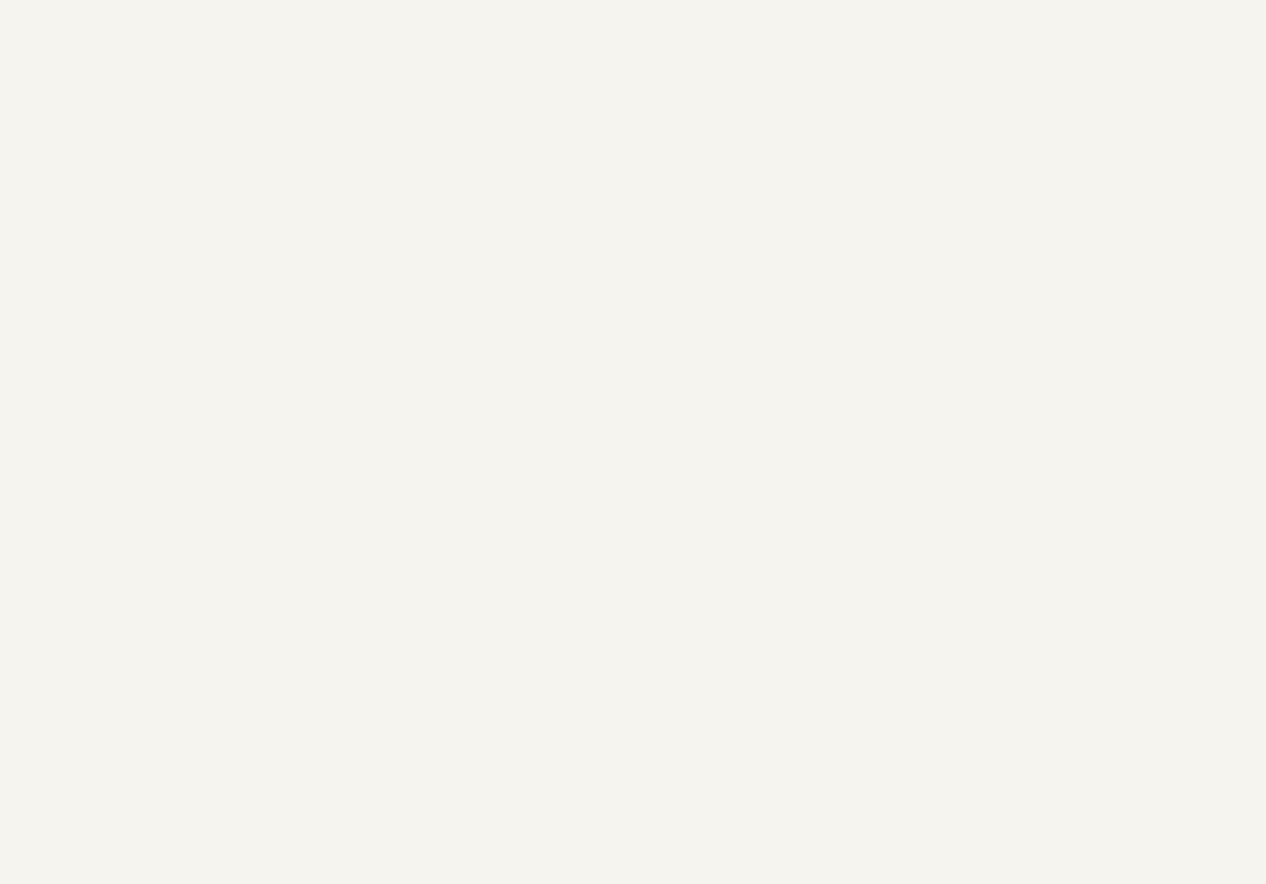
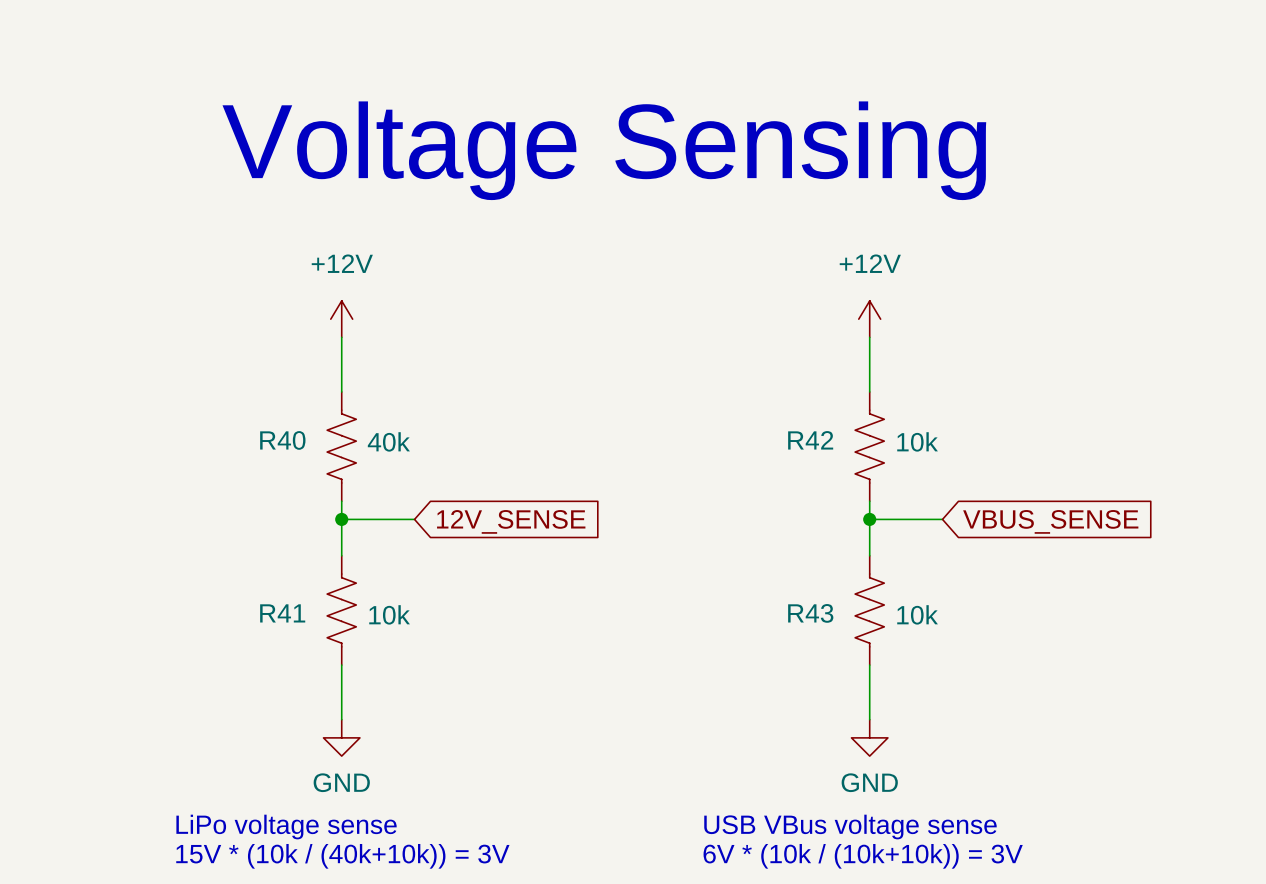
text: none -> Voltage Sensing (604, 150)
power symbol: none -> +12V (341, 319)
power symbol: none -> +12V (869, 319)
wire: none -> (341, 337) (341, 391)
wire: none -> (869, 337) (869, 391)
R40: none -> 40k (341, 446)
R42: none -> 10k (869, 446)
wire: none -> (341, 501) (341, 555)
wire: none -> (869, 501) (869, 555)
wire: none -> (341, 519) (414, 519)
junction: none -> (341, 519)
wire: none -> (869, 519) (942, 519)
junction: none -> (869, 519)
global label: none -> 12V_SENSE (511, 521)
global label: none -> VBUS_SENSE (1050, 521)
R41: none -> 10k (341, 610)
R43: none -> 10k (869, 610)
wire: none -> (341, 665) (341, 719)
wire: none -> (869, 665) (869, 719)
power symbol: none -> GND (341, 737)
power symbol: none -> GND (869, 737)
text: none -> LiPo voltage sense (286, 827)
text: none -> USB VBus voltage sense (850, 827)
text: none -> 15V * (10k / (40k+10k)) = 3V (342, 856)
text: none -> 6V * (10k / (10k+10k)) = 3V (863, 856)

